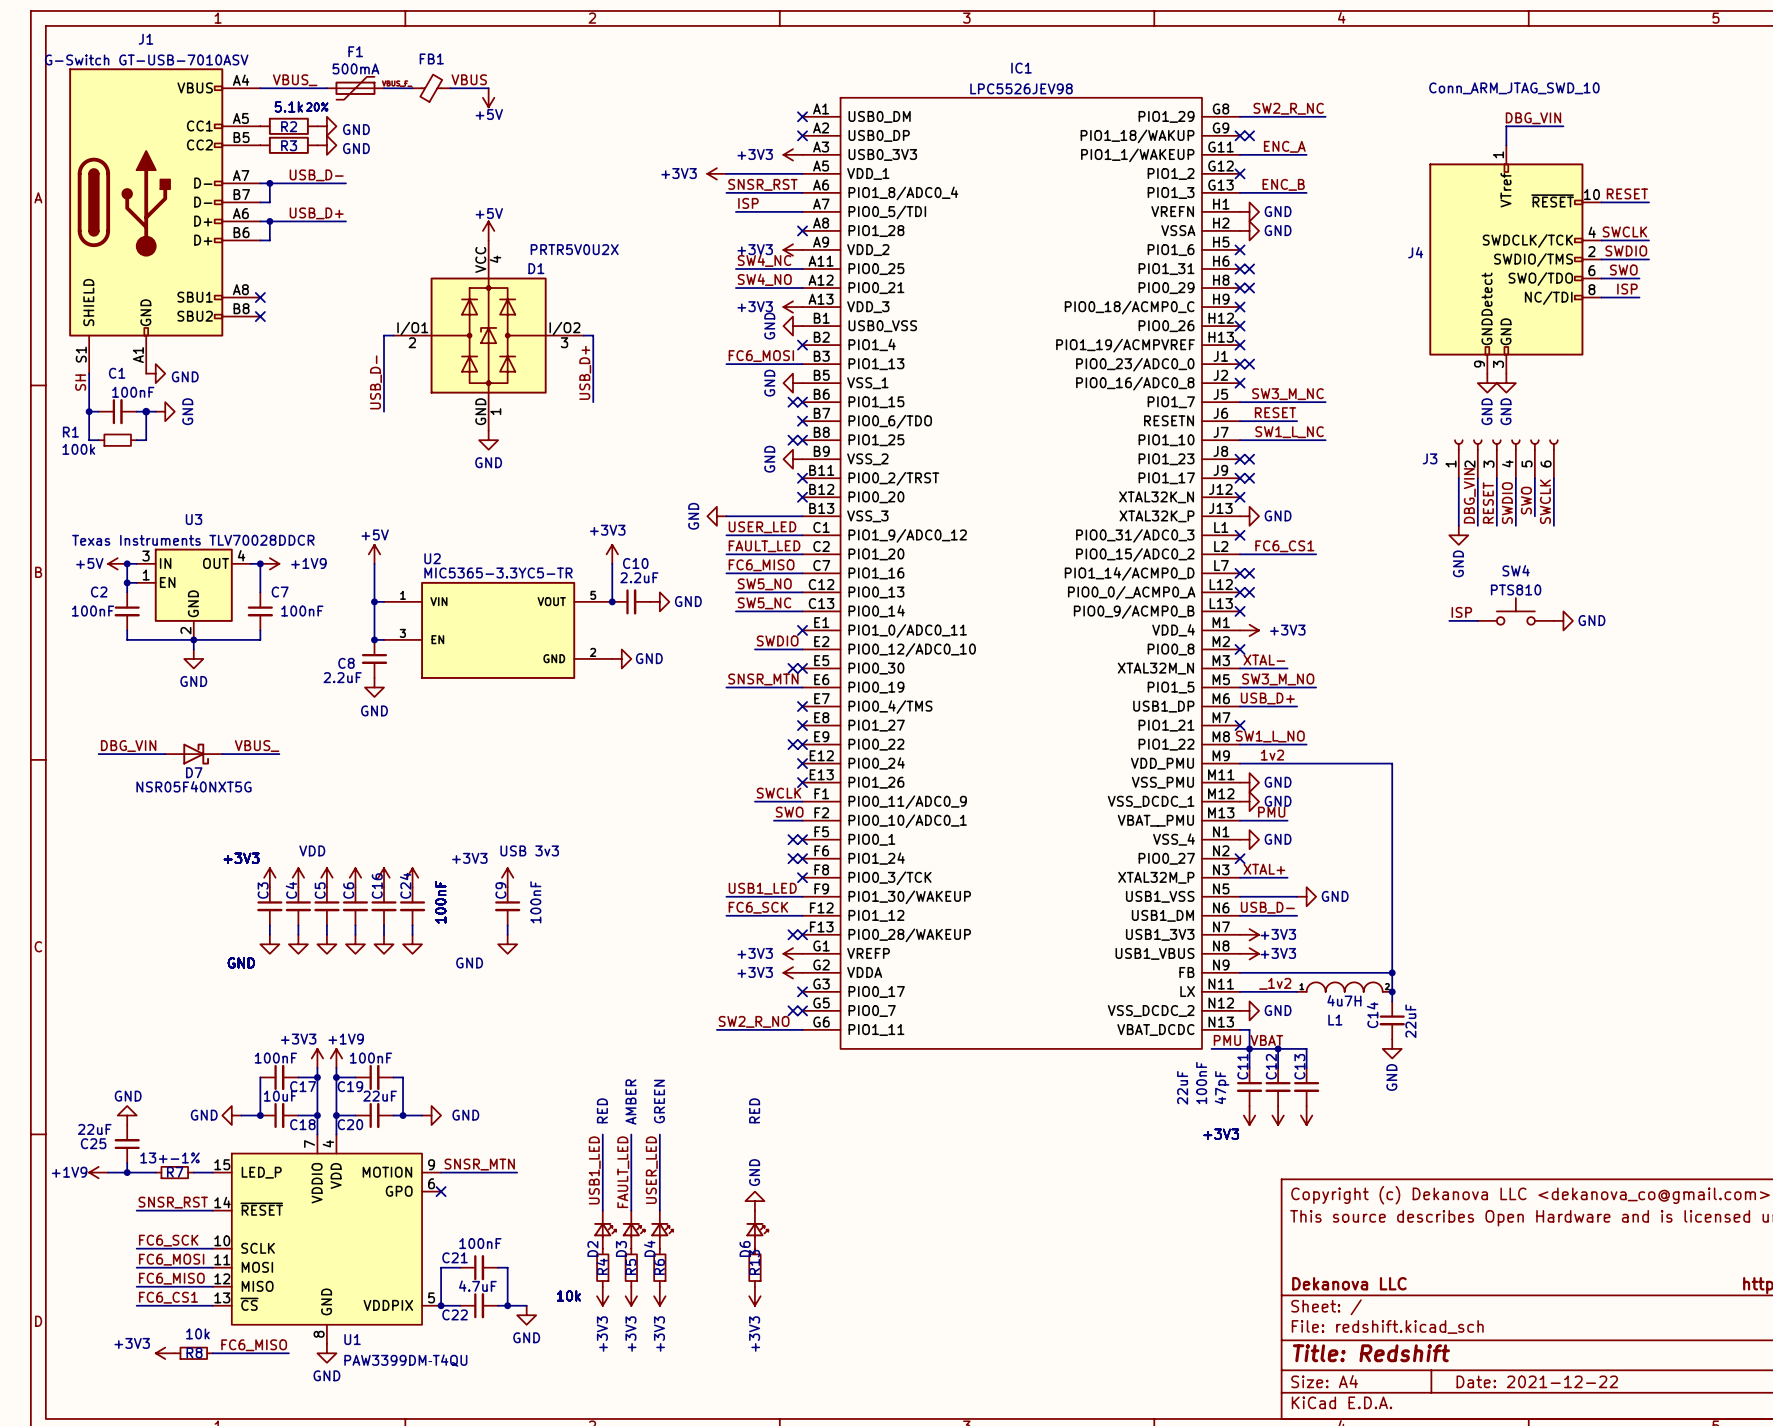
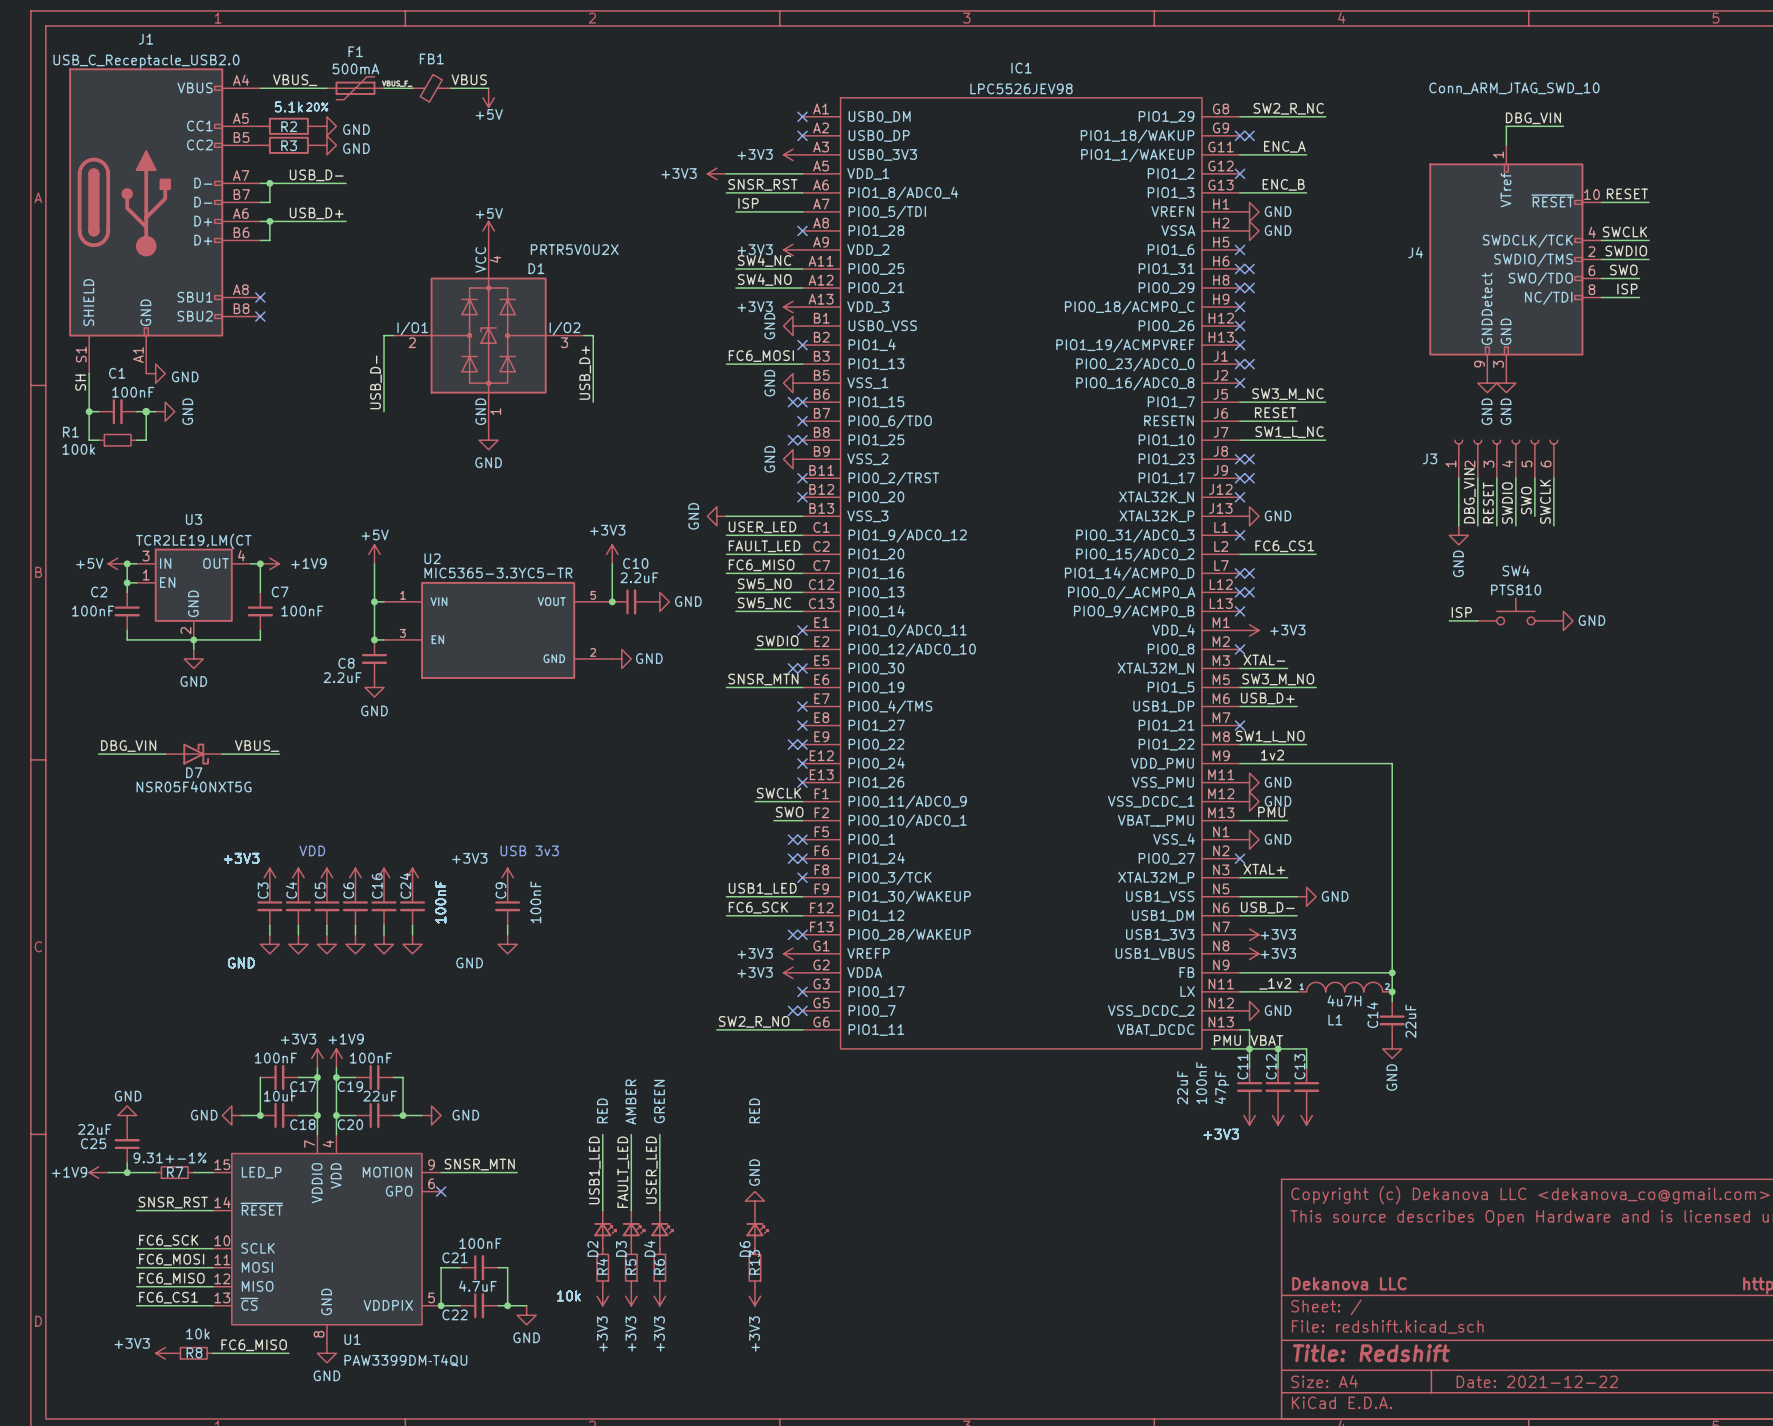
J1 value: G-Switch GT-USB-7010ASV (146, 59) -> USB_C_Receptacle_USB2.0 (146, 61)
U3 value: Texas Instruments TLV70028DDCR (193, 540) -> TCR2LE19,LM(CT (193, 541)
R7 value: 13+-1% (169, 1157) -> 9.31+-1% (169, 1157)

